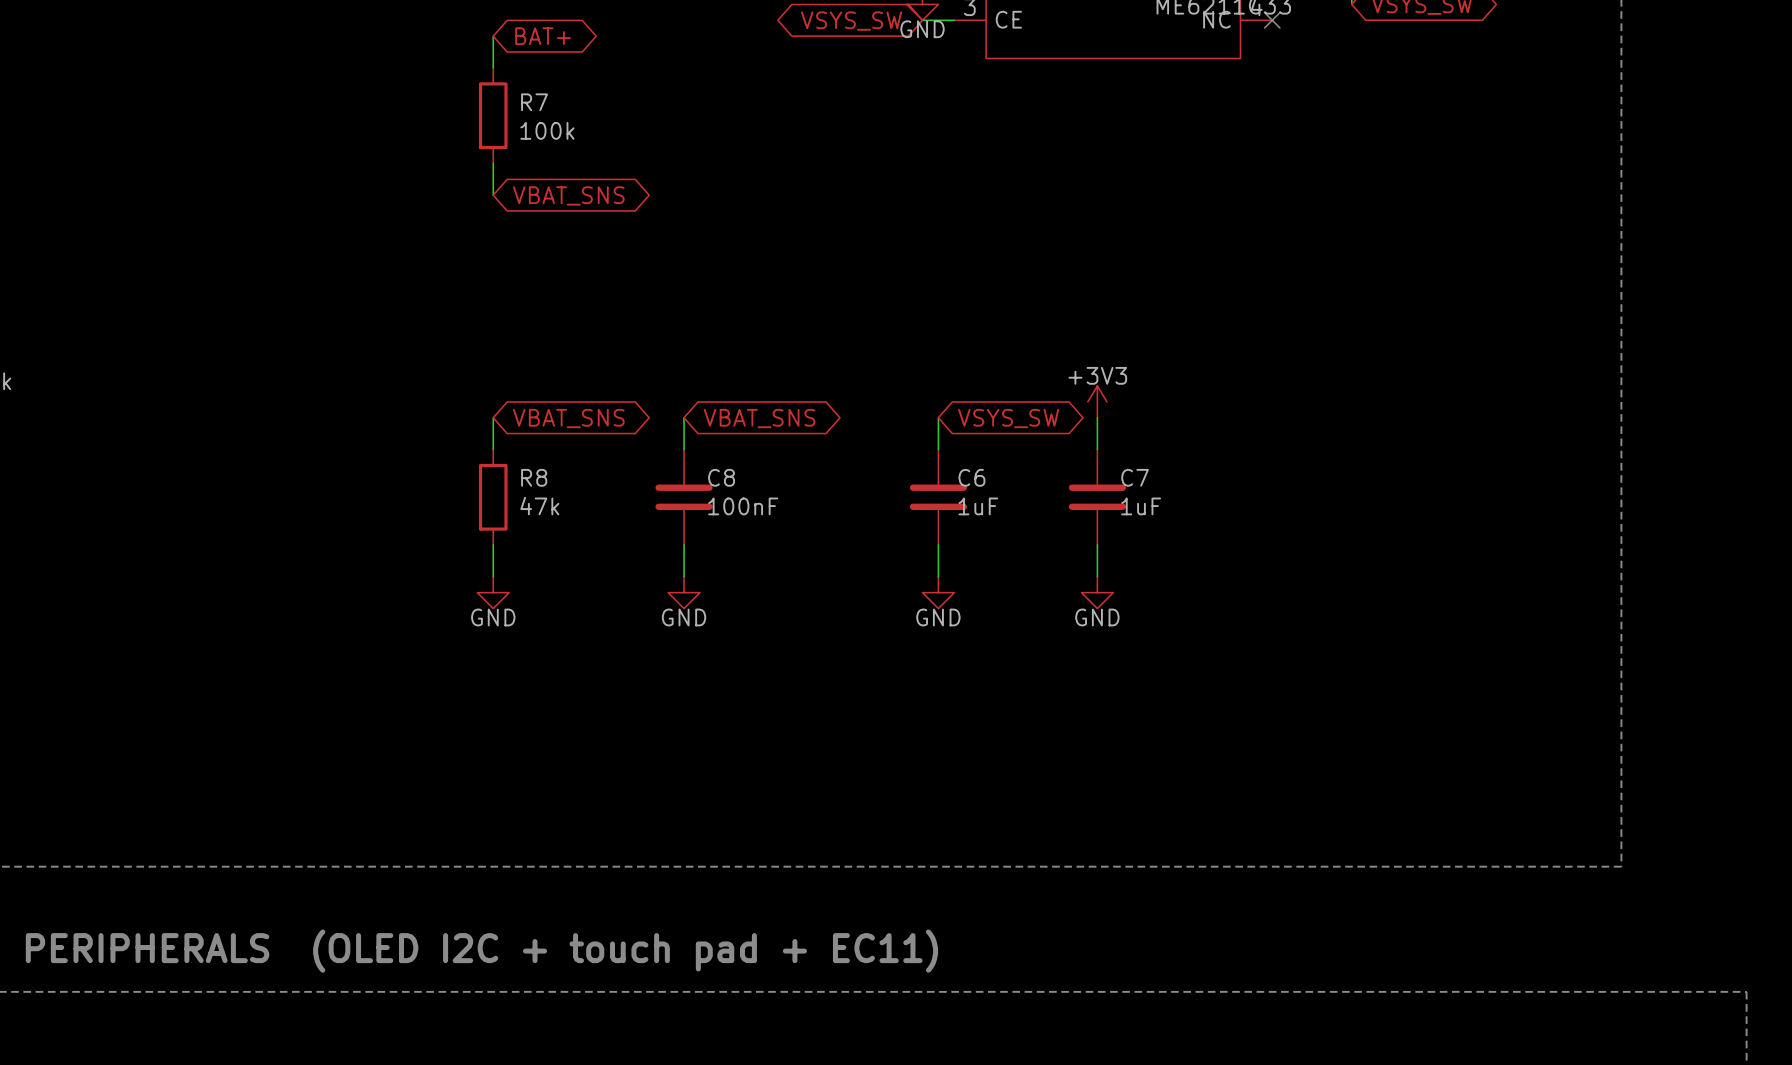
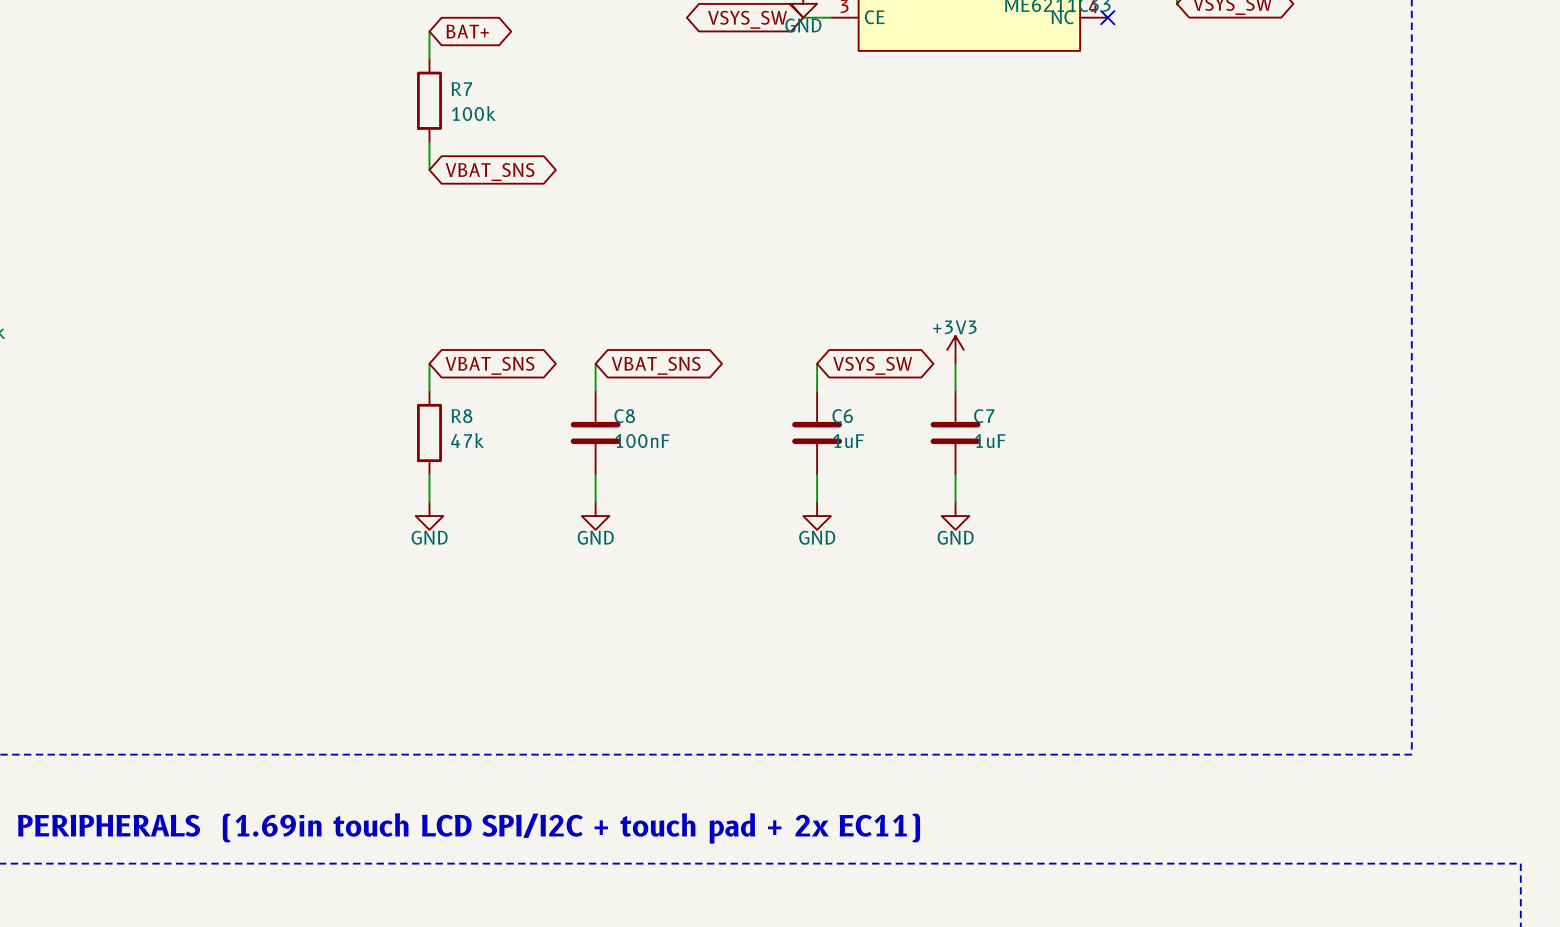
text: PERIPHERALS (OLED I2C + touch pad + EC11) (481, 951) -> PERIPHERALS (1.69in touch LCD SPI/I2C + touch pad + 2x EC11) (468, 828)

